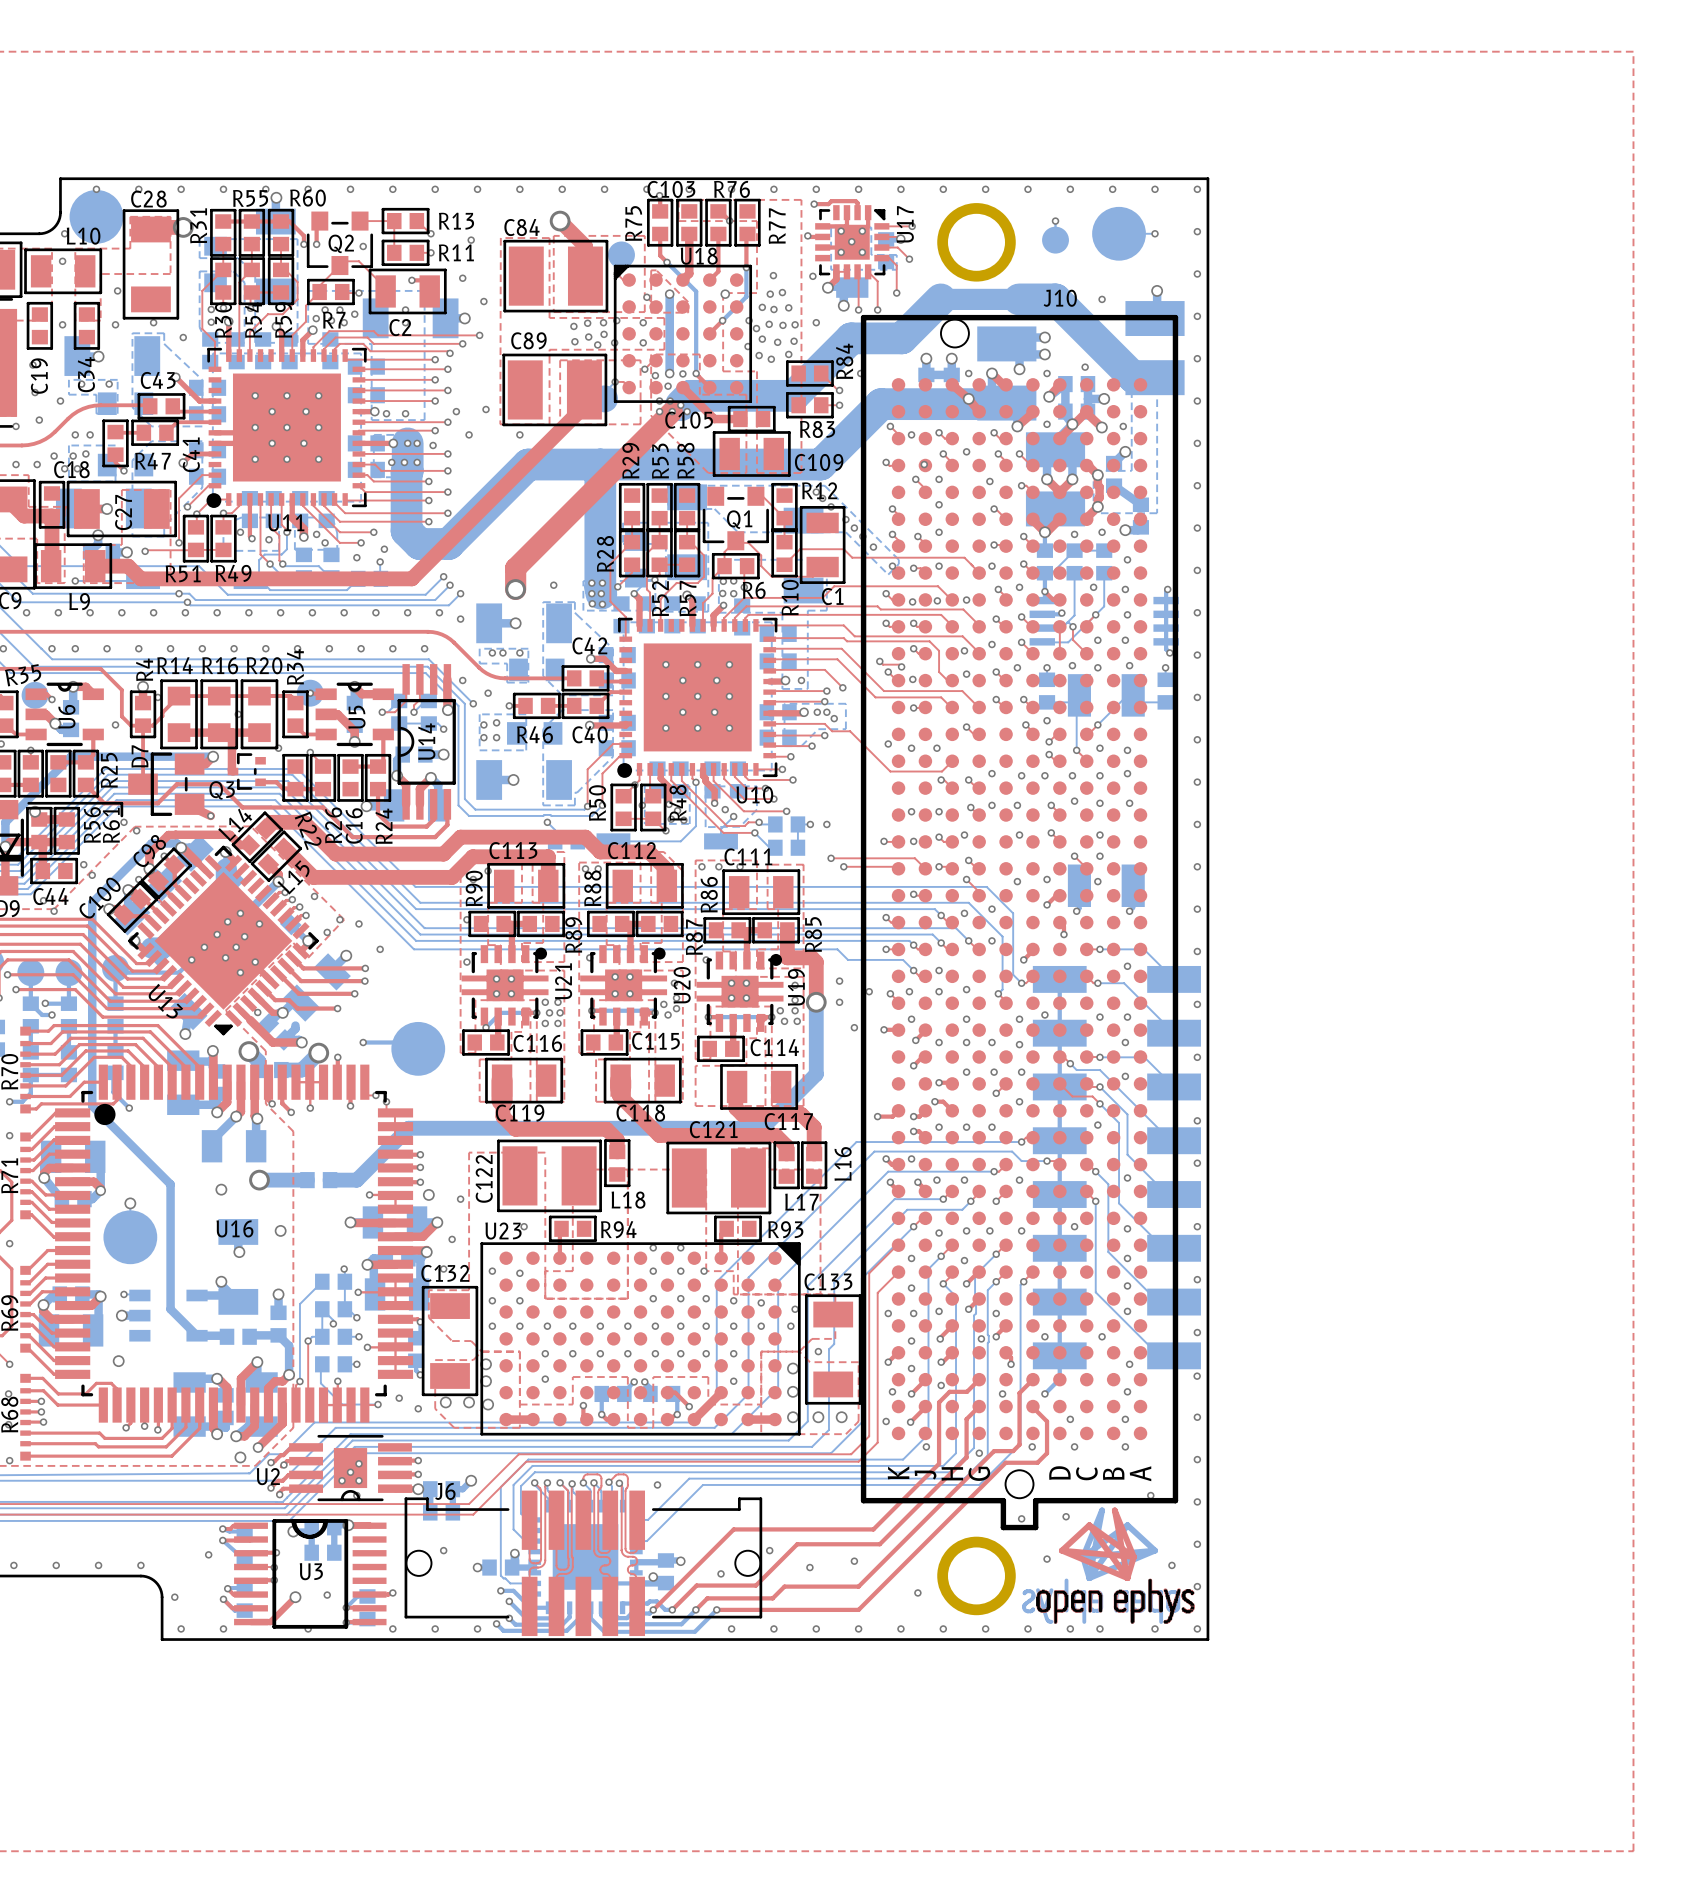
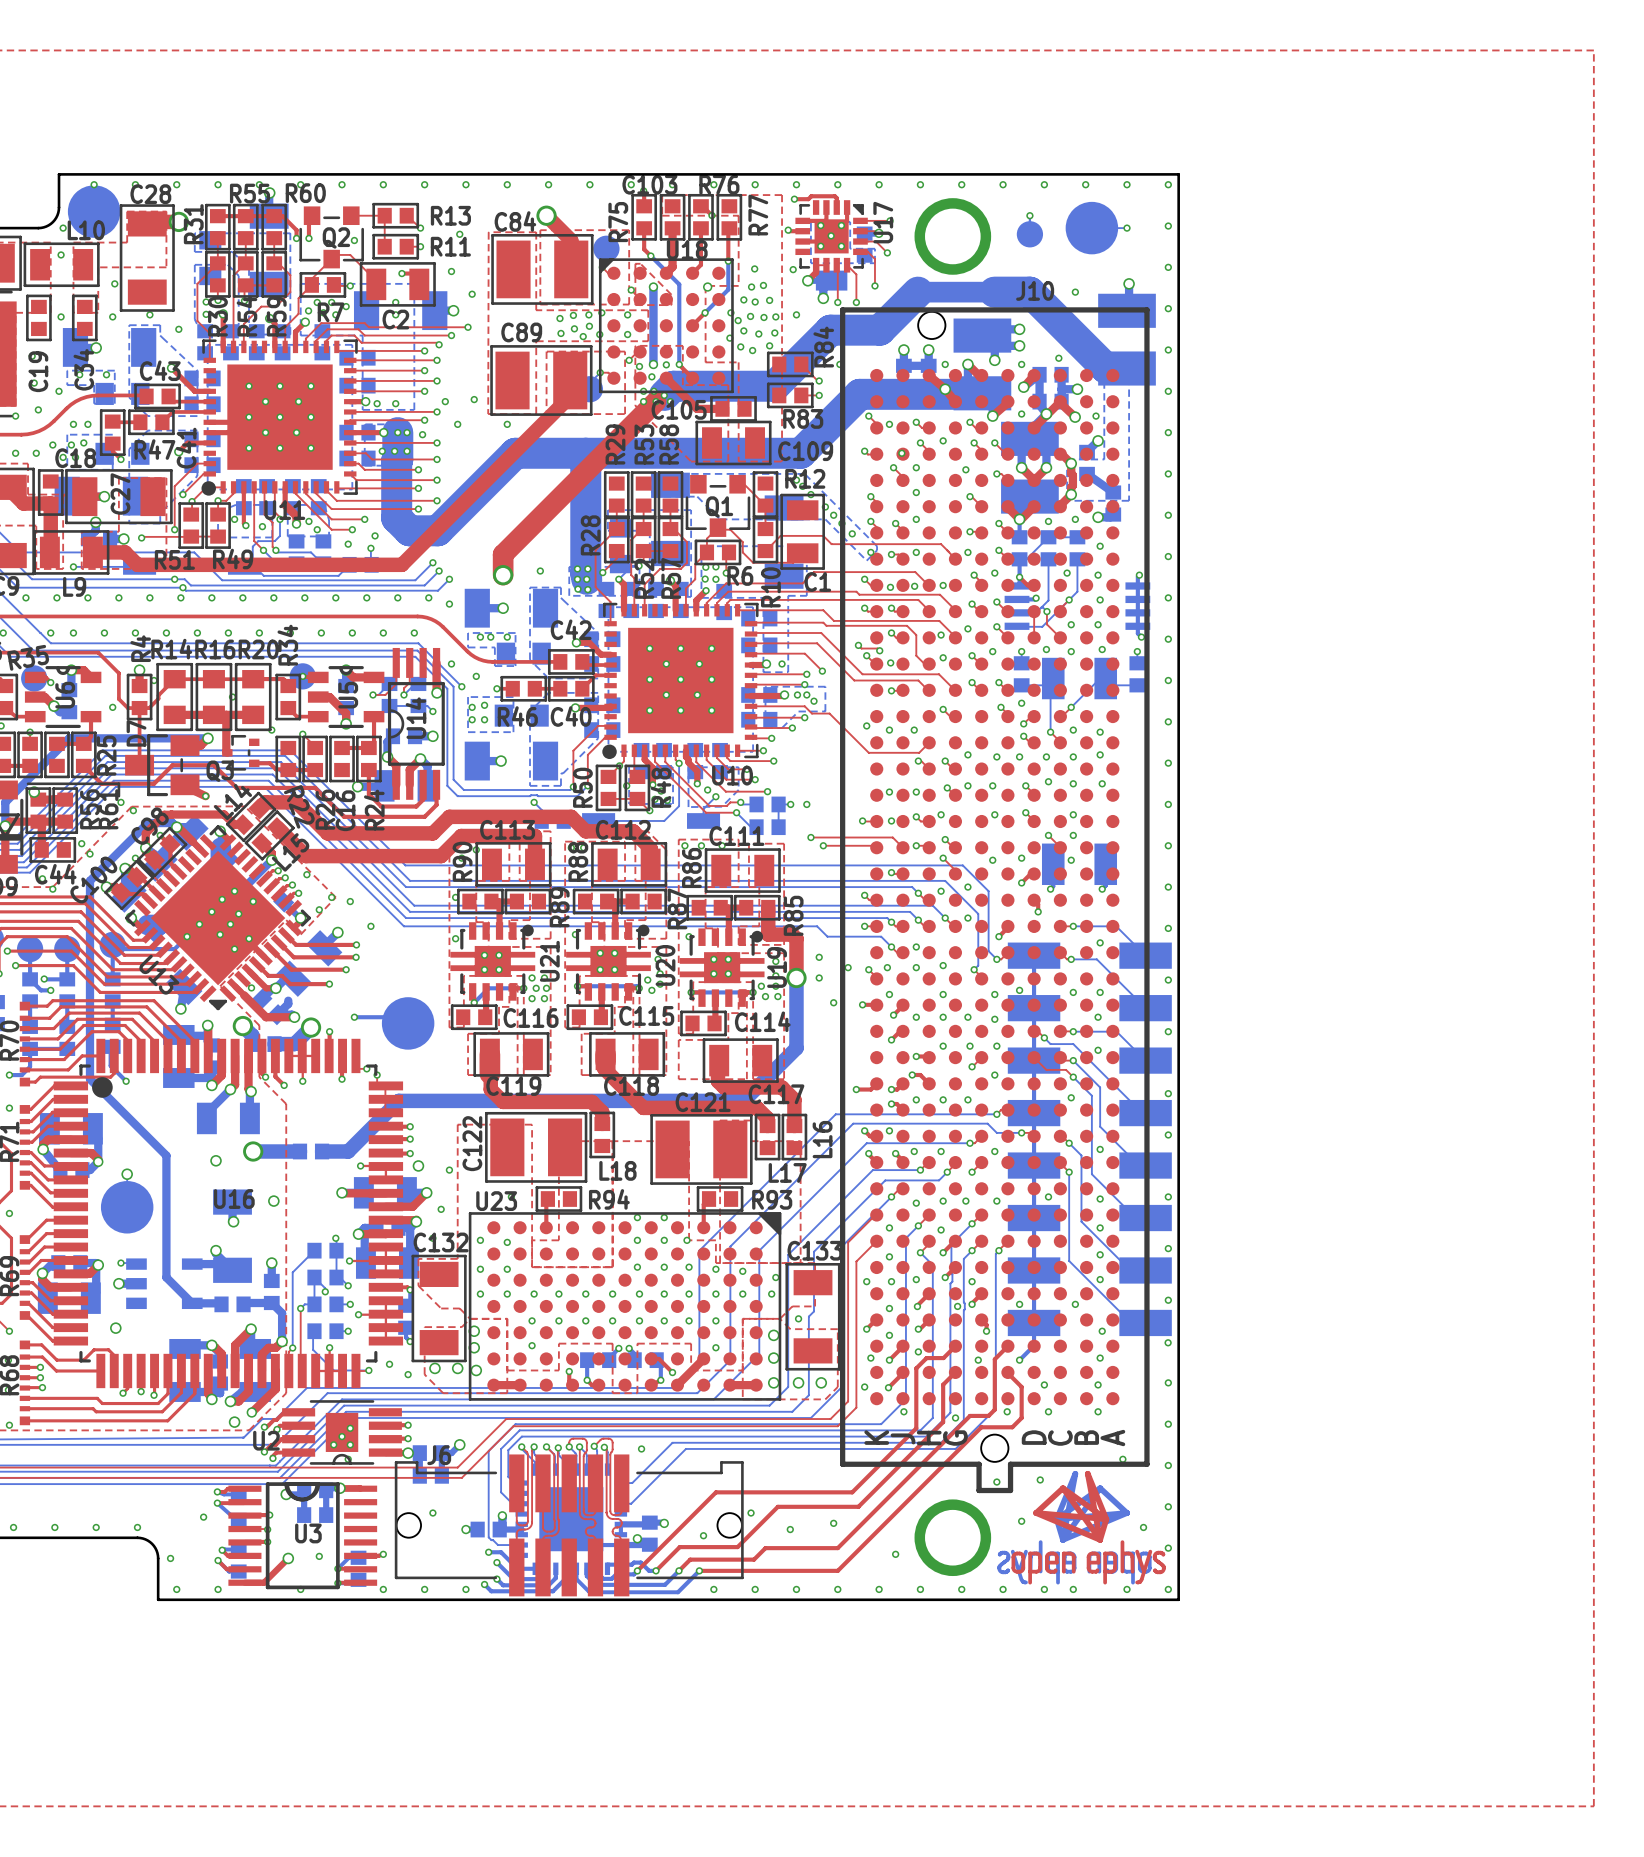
drawing shape: [1036, 1507, 1195, 1624] -> [1011, 1470, 1166, 1585]

